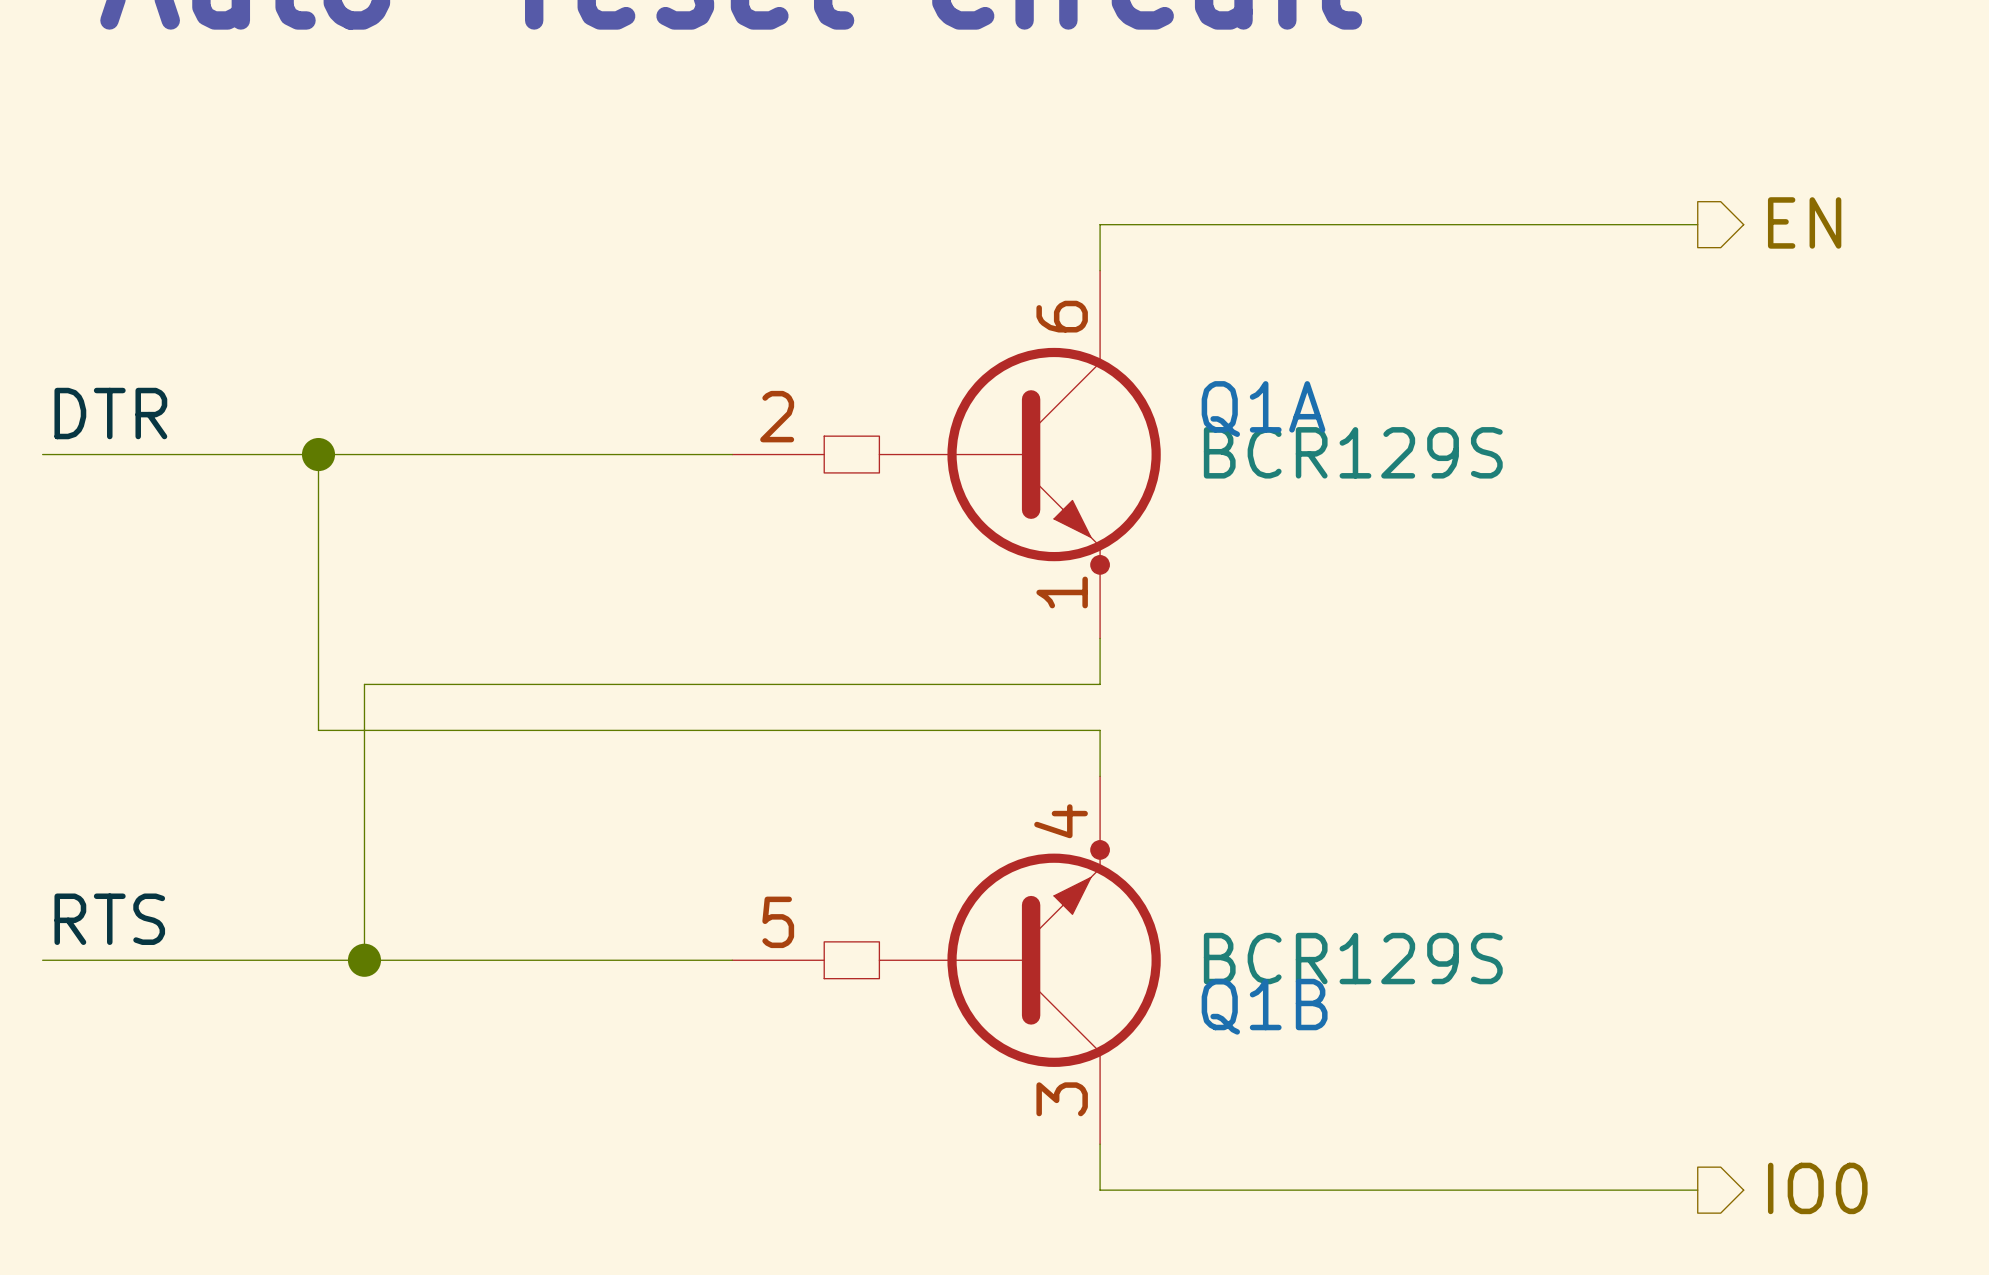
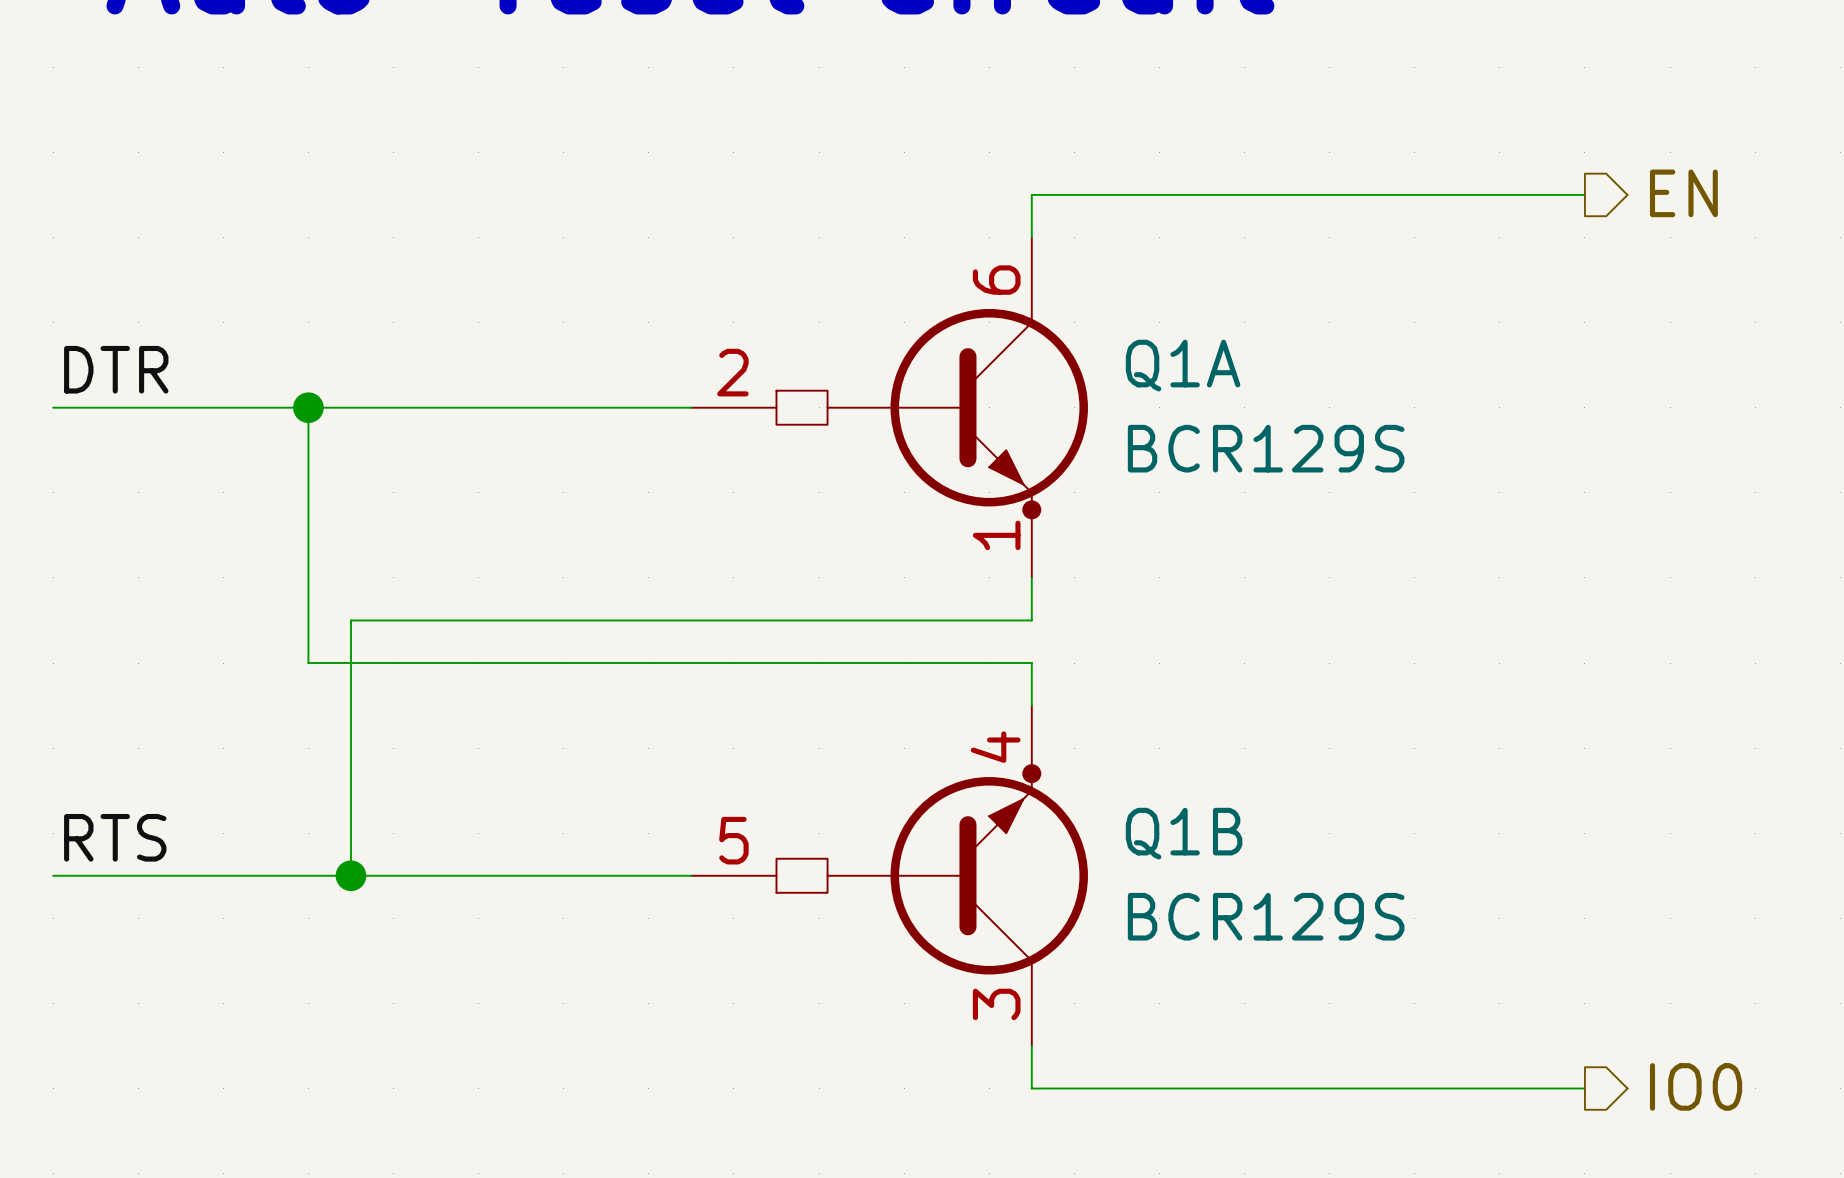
Q1A value position: BCR129S (1353, 452) -> BCR129S (1266, 448)
Q1B value position: BCR129S (1353, 958) -> BCR129S (1266, 916)
Q1B name position: Q1B (1264, 1006) -> Q1B (1184, 833)

